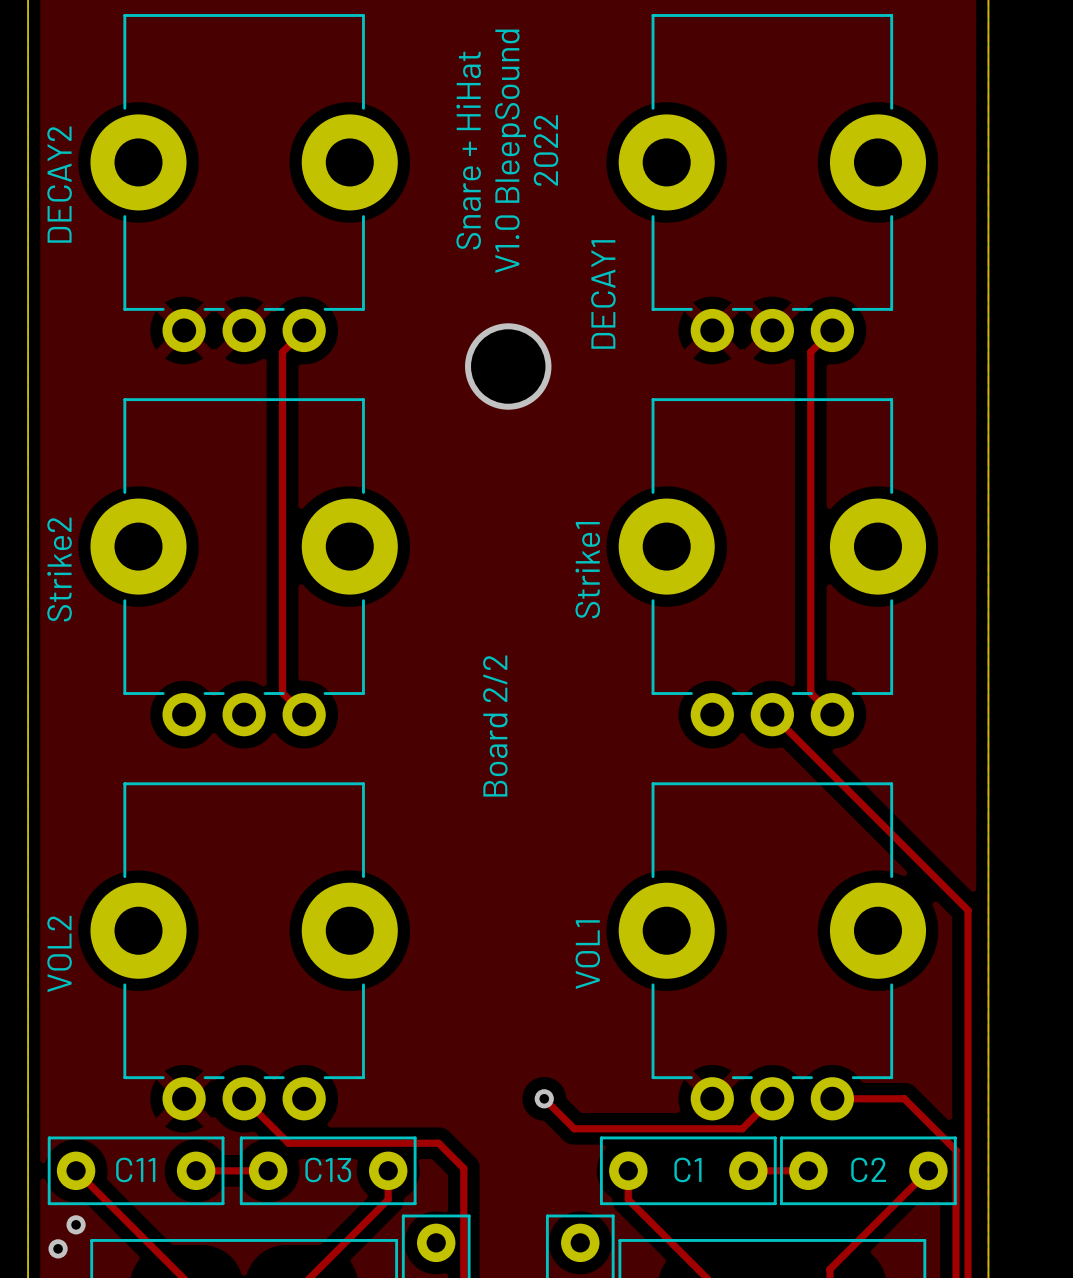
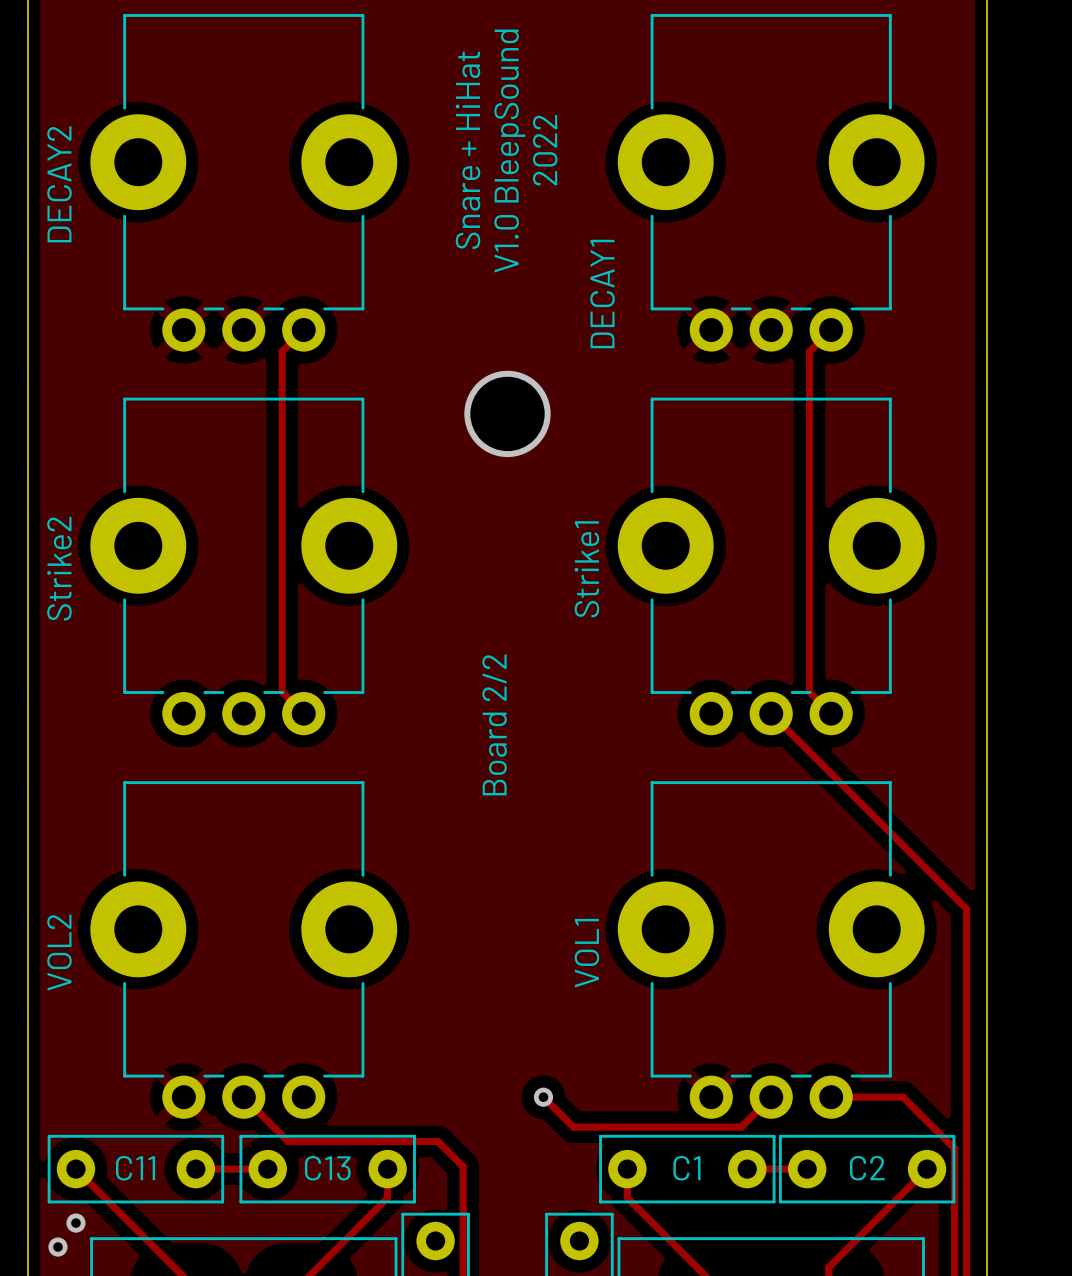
via position: (508, 366) -> (507, 413)

